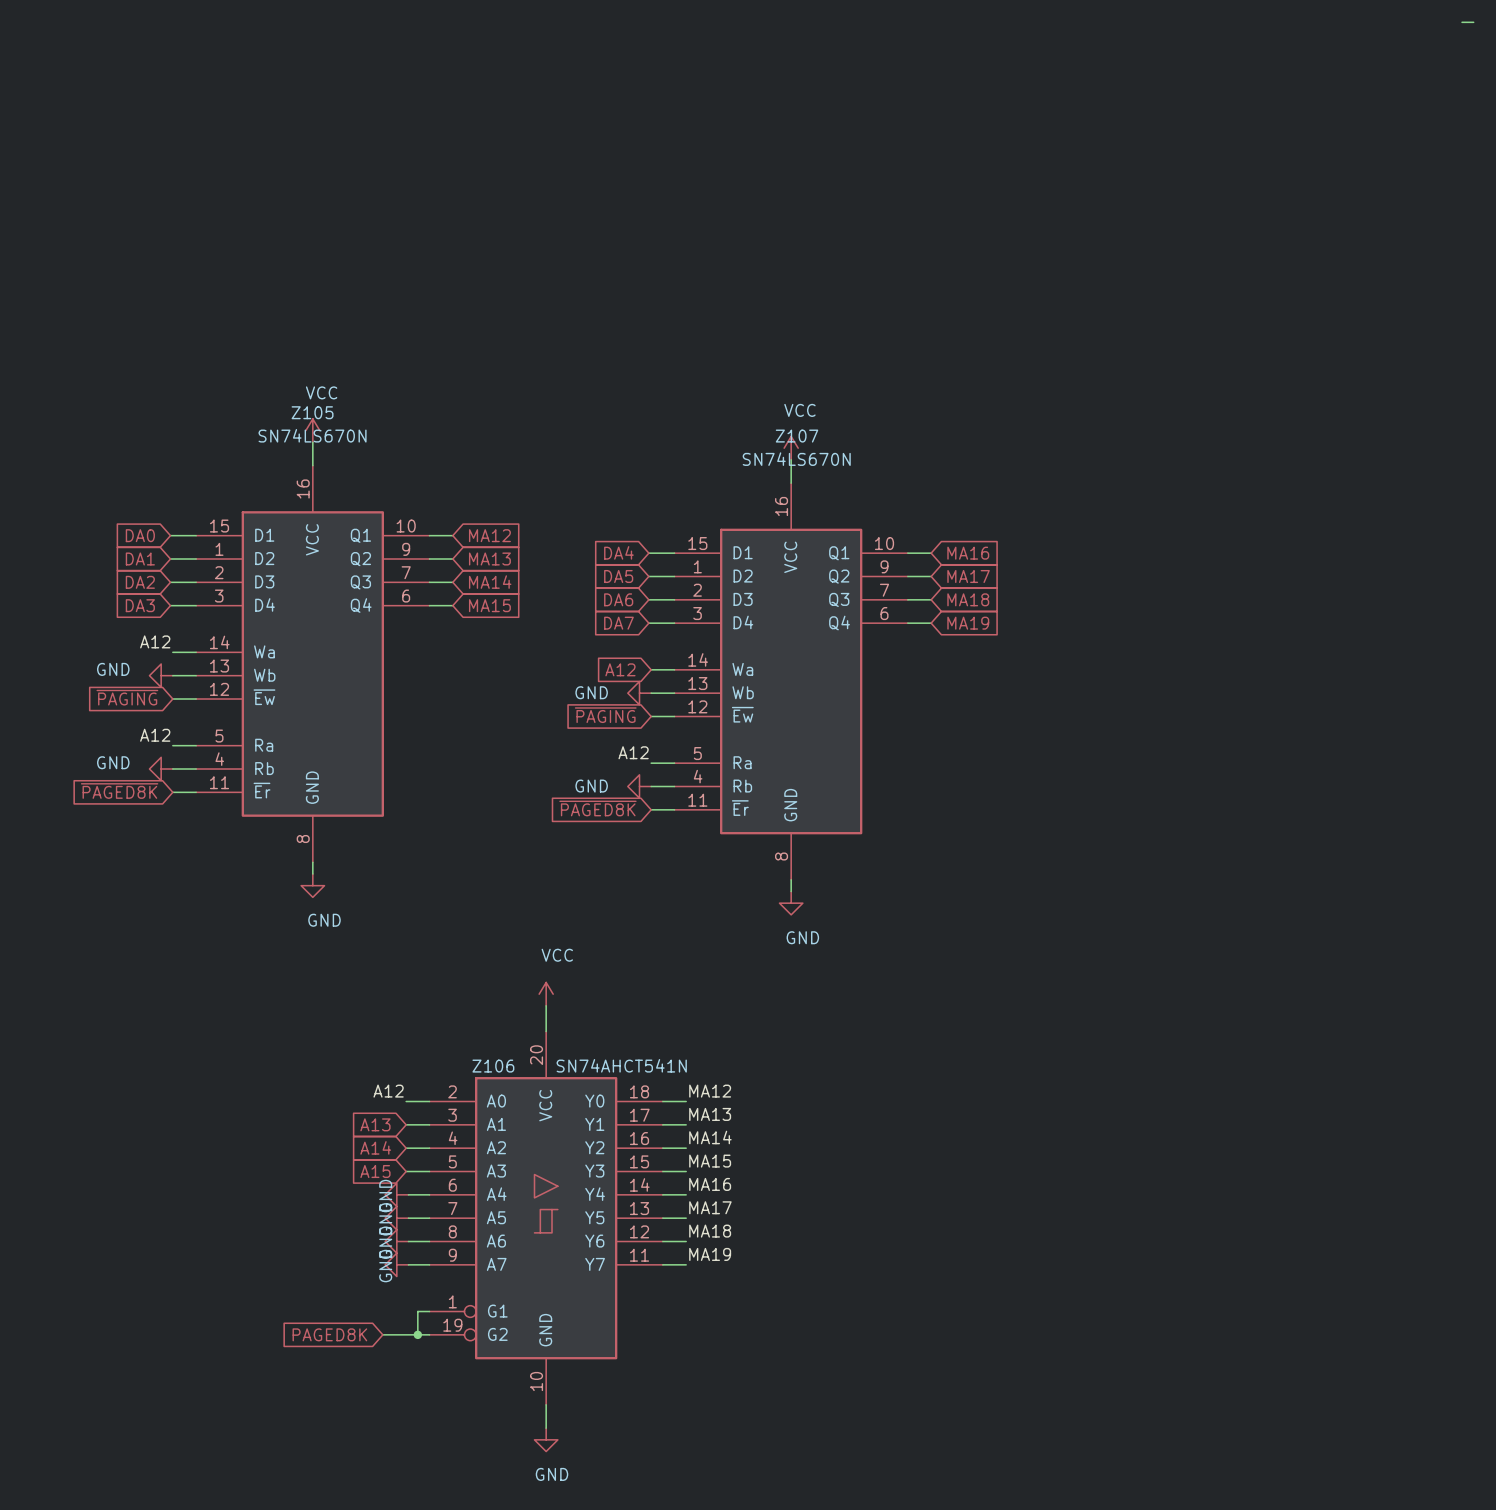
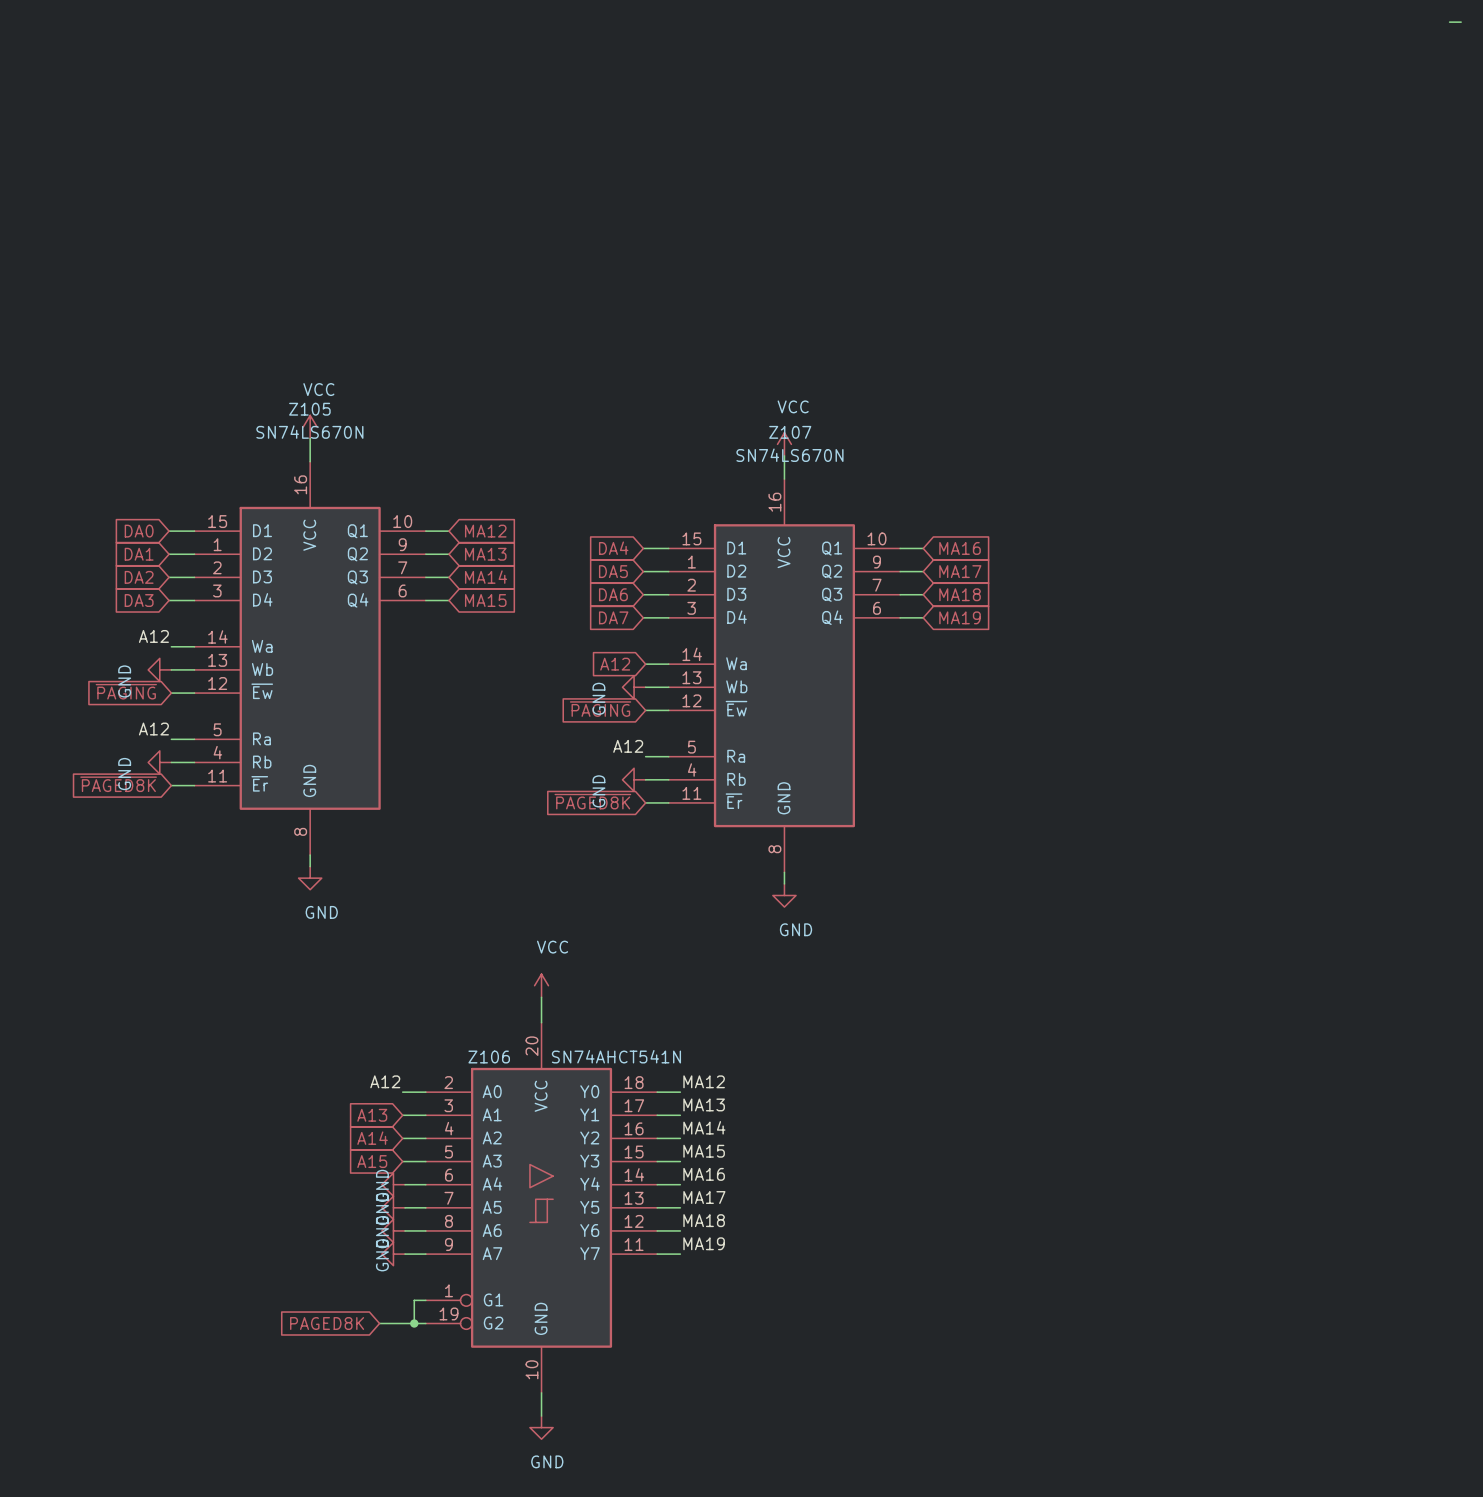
power symbol text rotation: 0° (113, 669) -> 90° counterclockwise (124, 681)
power symbol text rotation: 0° (591, 692) -> 90° counterclockwise (598, 698)
power symbol text rotation: 0° (113, 762) -> 90° counterclockwise (124, 774)
power symbol text rotation: 0° (591, 786) -> 90° counterclockwise (598, 791)

